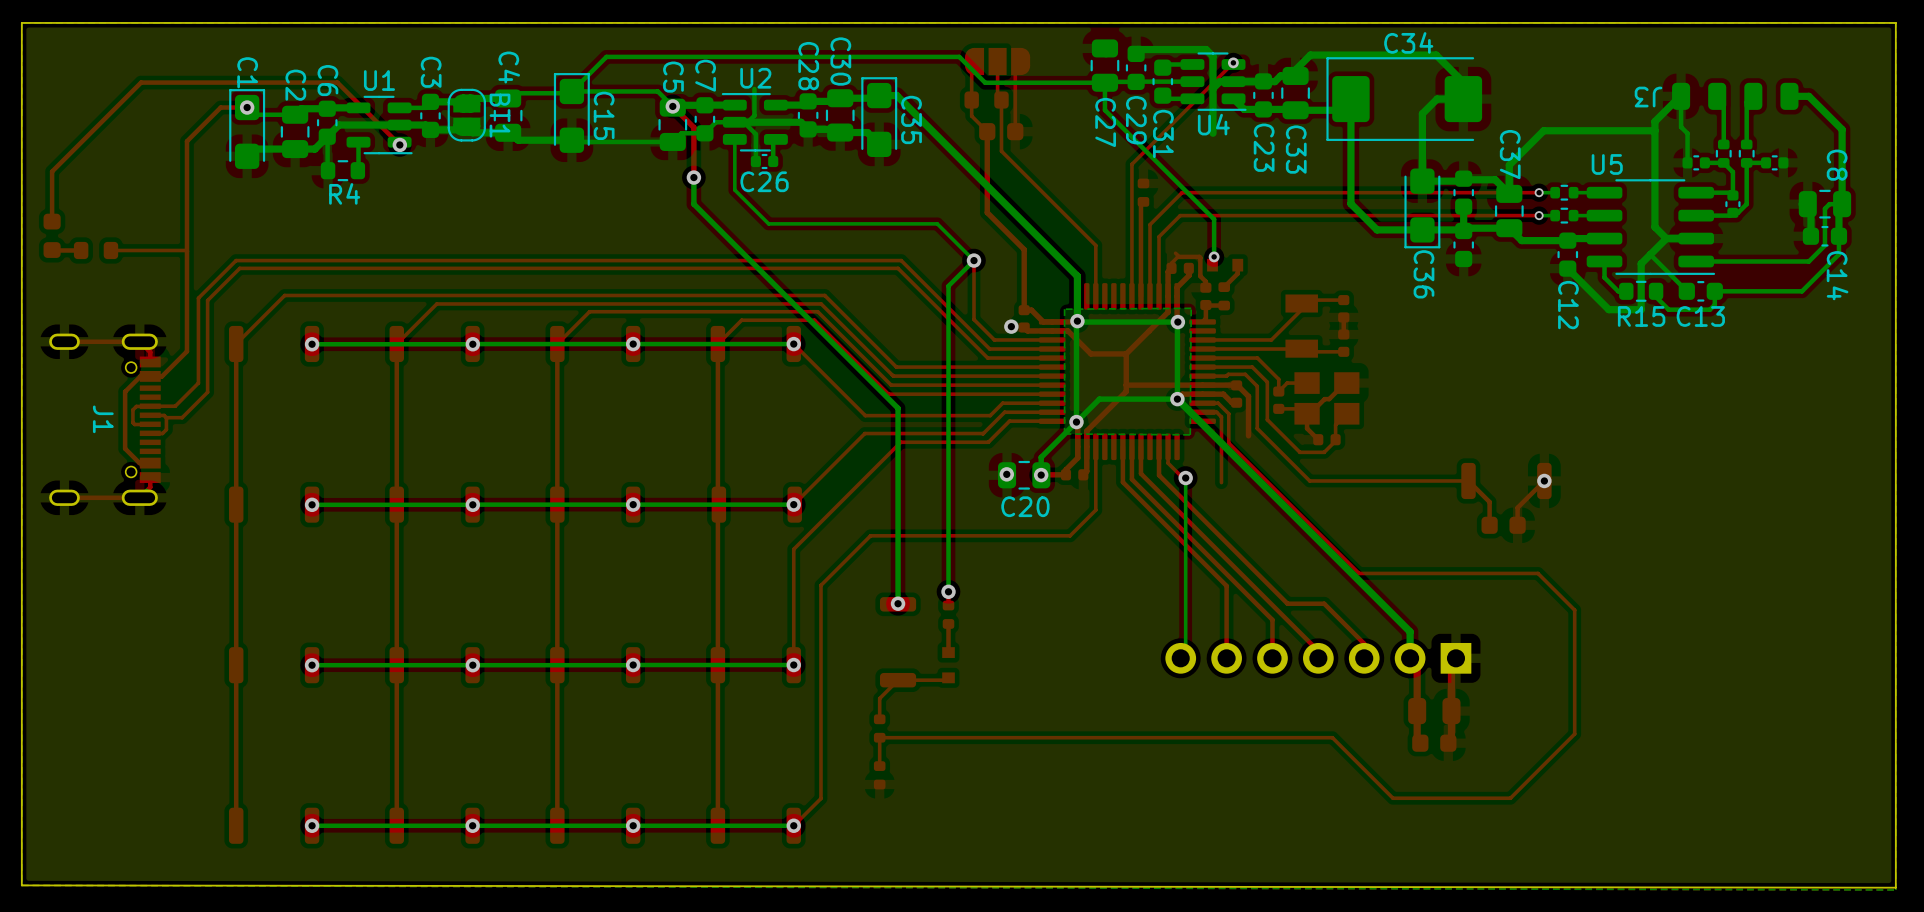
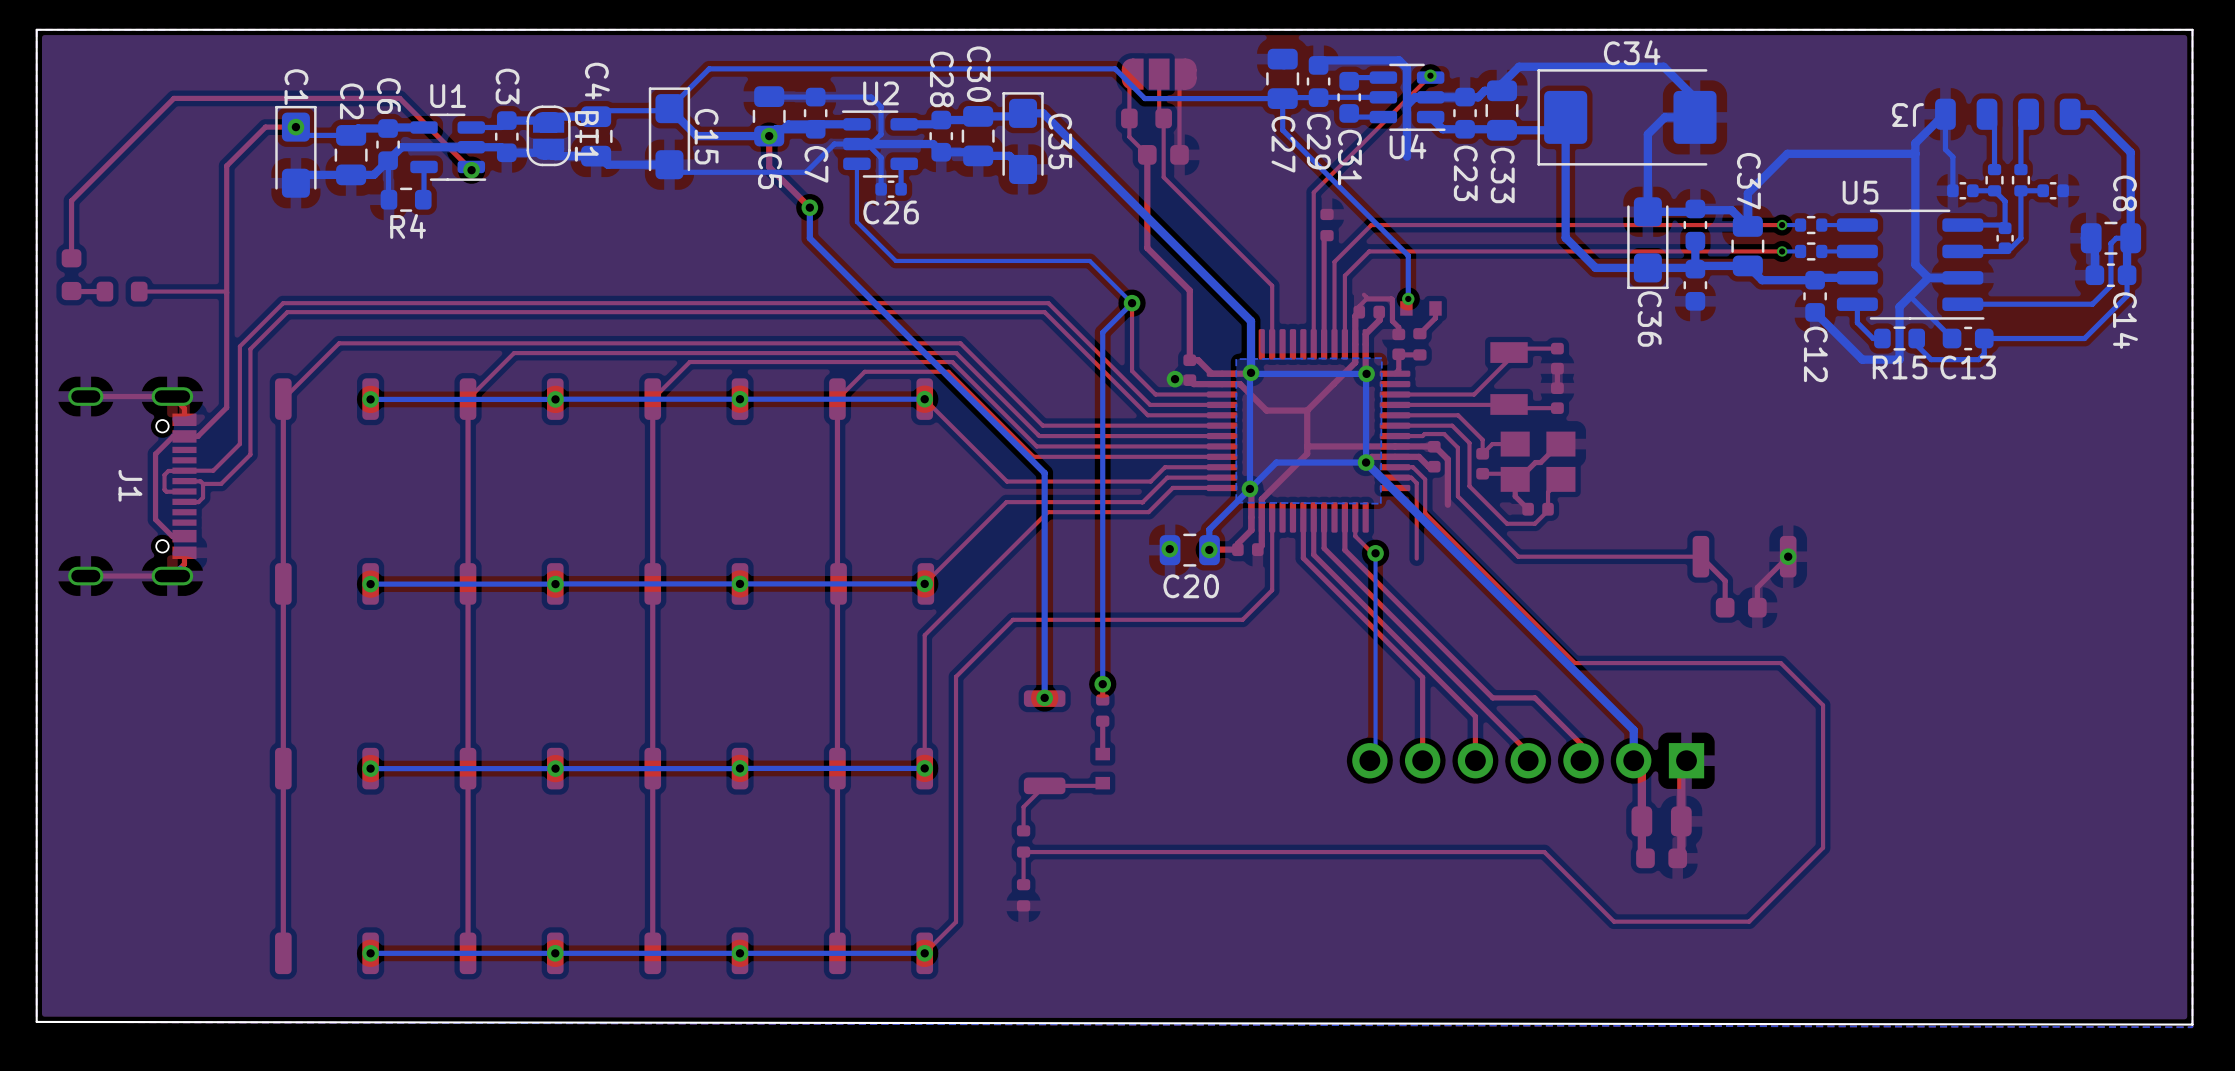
C7 name position: C7 (705, 75) -> C7 (816, 164)
C5 name position: C5 (673, 77) -> C5 (769, 171)
bottom track: (754, 89) (754, 115) (747, 122) -> (769, 96) (871, 97) (881, 106) (881, 134) (871, 144)
bottom track: (571, 91) (657, 91) (672, 106) -> (669, 108) (696, 136) (769, 136) (776, 129) (815, 129) (822, 124)
top track: (672, 106) (693, 127) (693, 177) -> (769, 136) (769, 167) (809, 207)
via position: (672, 106) -> (769, 136)
C7 position: (704, 119) -> (815, 113)
bottom track: (715, 122) (704, 133) (681, 133) (672, 141) (573, 141) -> (835, 144) (806, 172) (677, 172)
C5 position: (672, 124) -> (769, 116)

